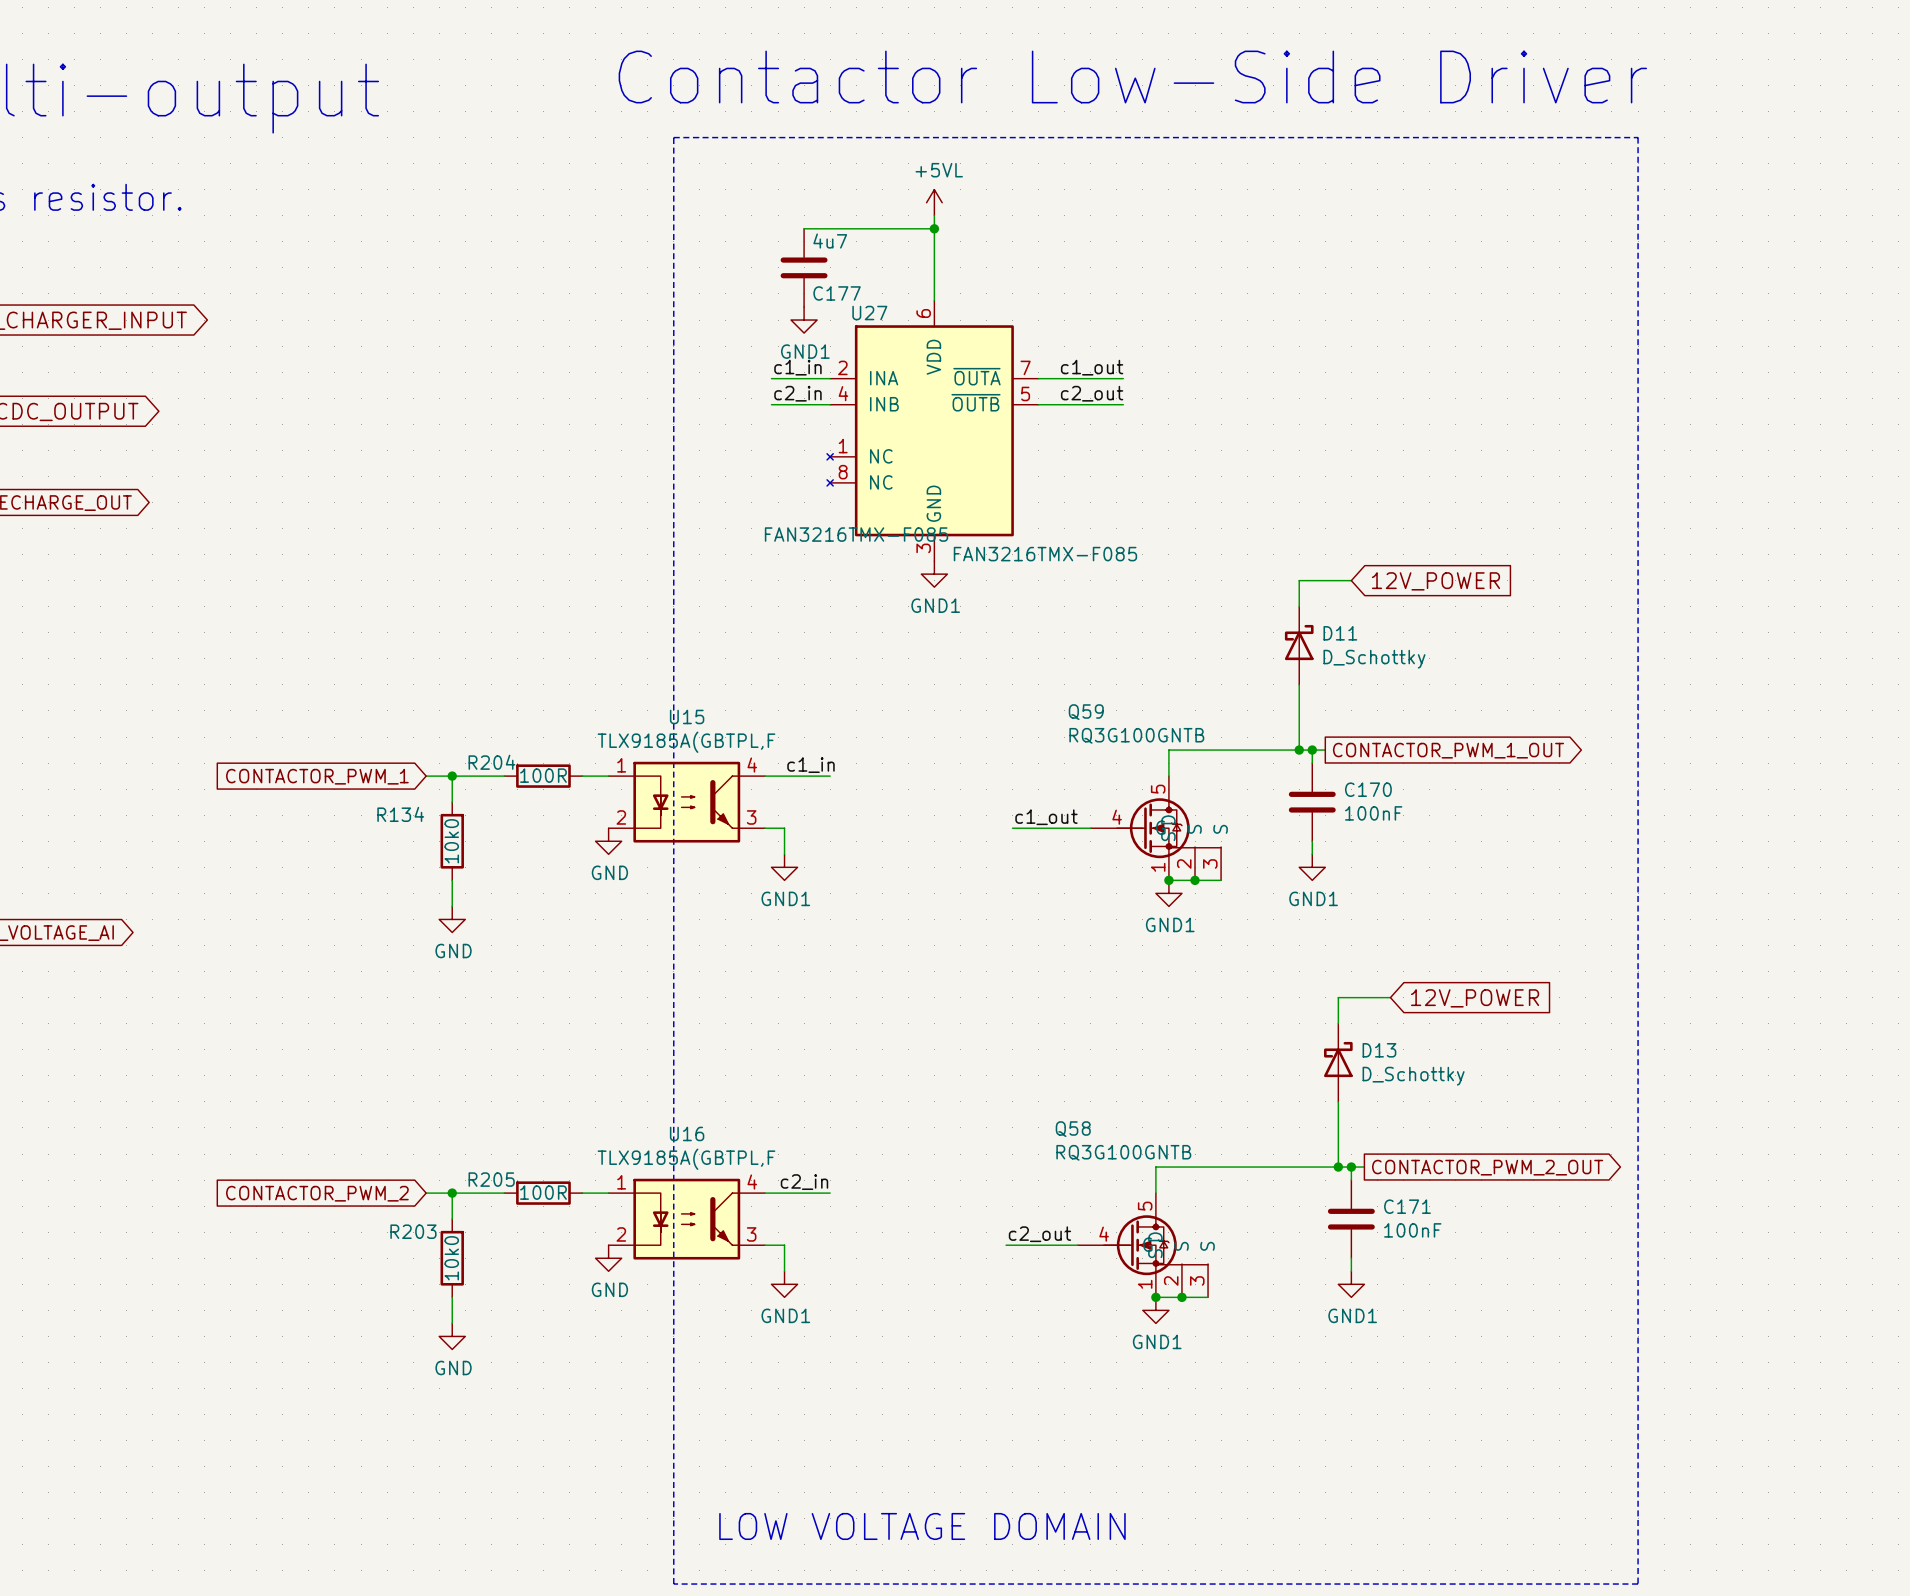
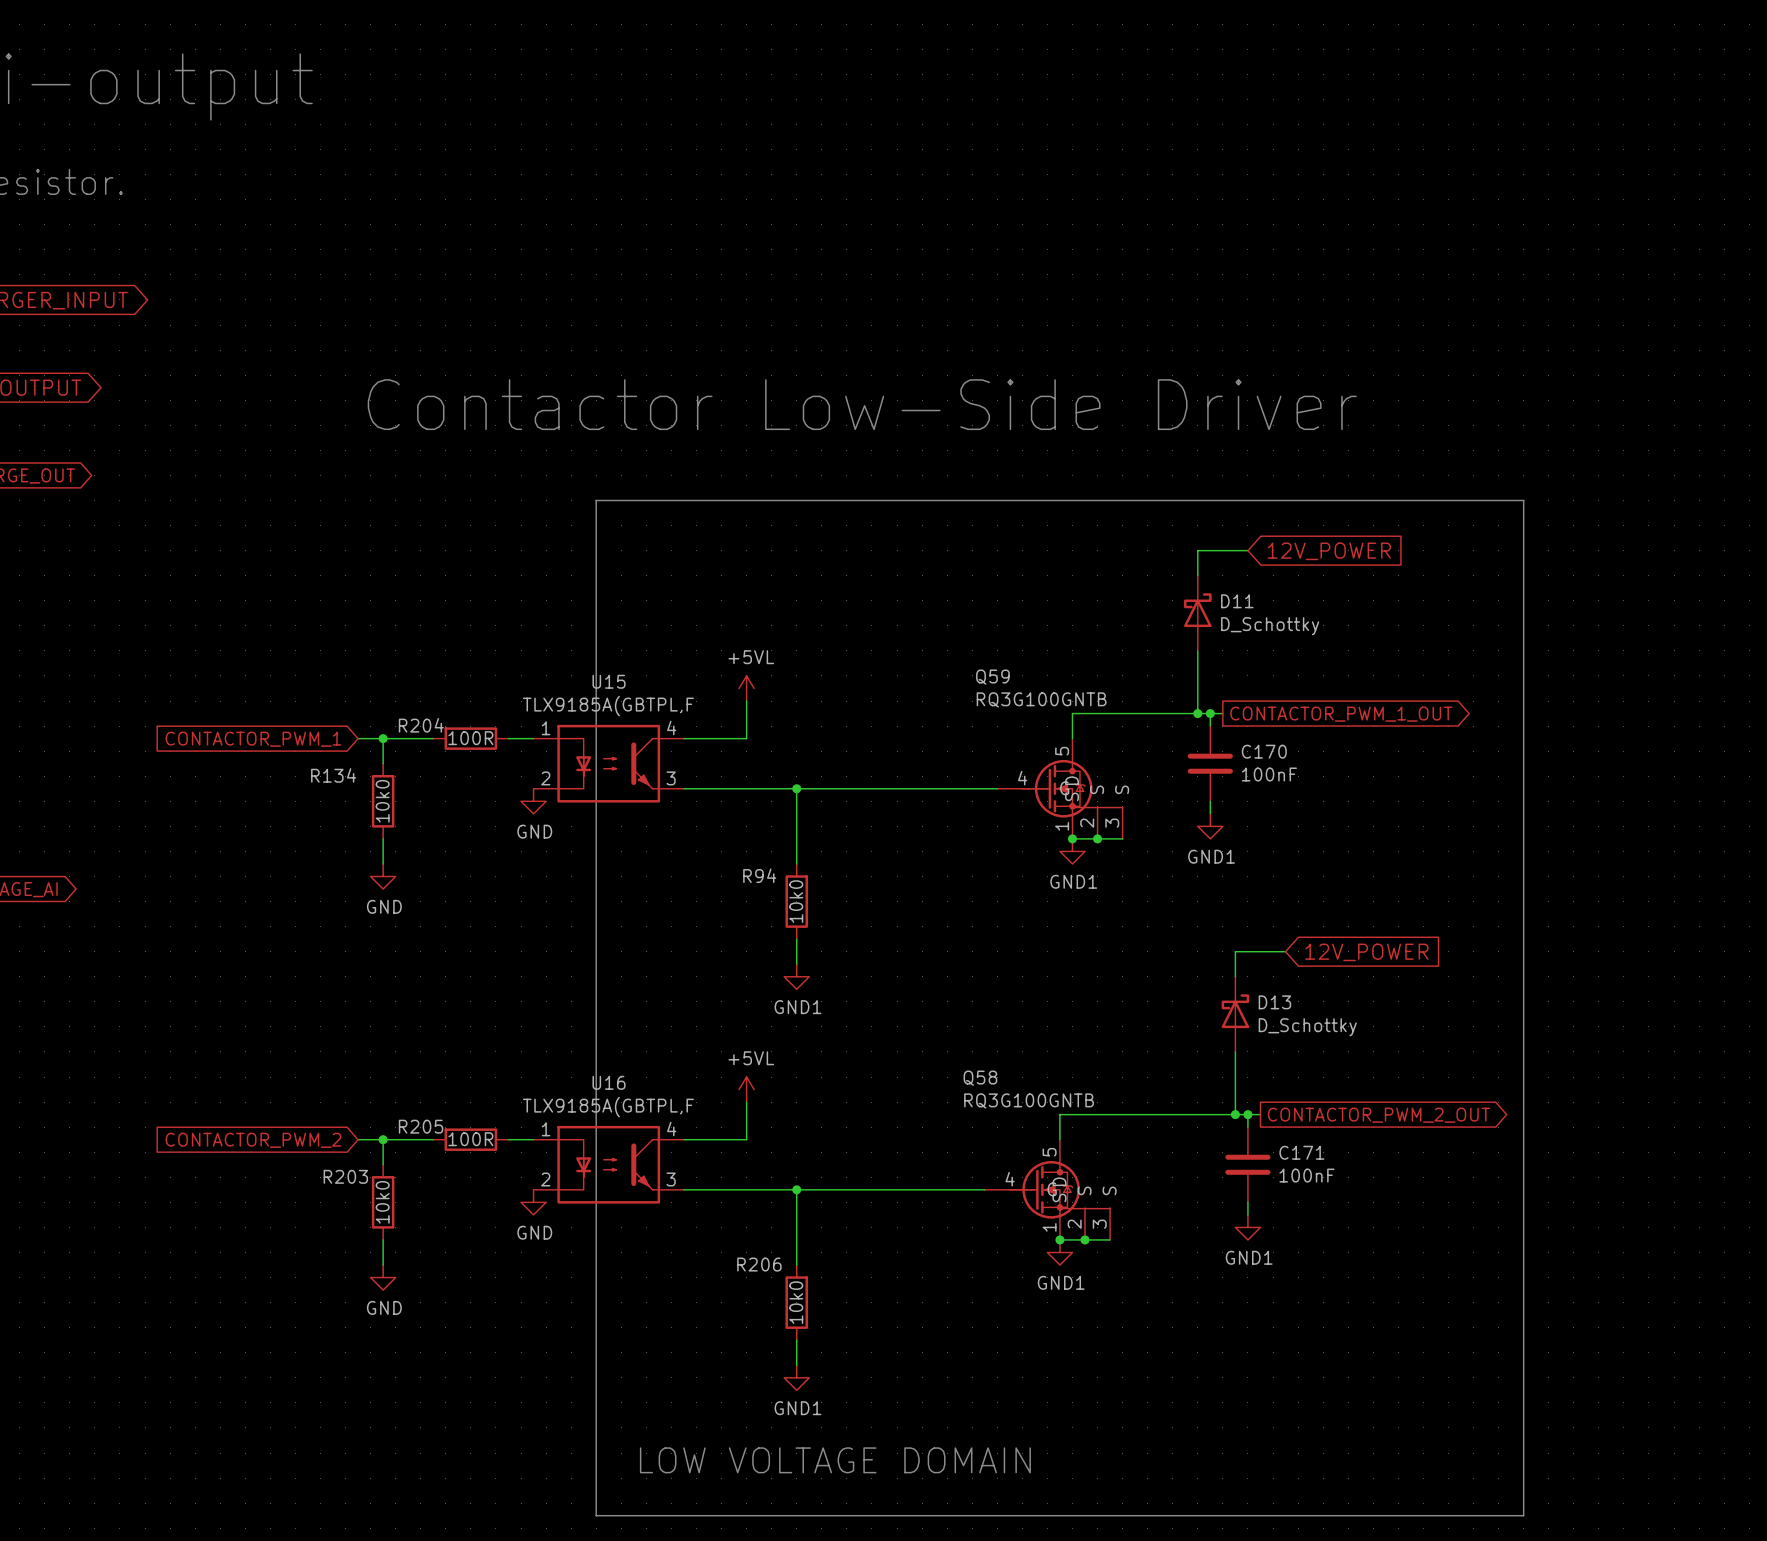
text: Contactor Low-Side Driver (1132, 77) -> none
line: (673, 137) (673, 1584) (1638, 1584) (1638, 137) (673, 137) -> (596, 500) (596, 1515) (1523, 1515) (1523, 500) (596, 500)
power symbol: +5VL (934, 202) -> none
wire: (934, 215) (934, 300) -> none
wire: (804, 228) (934, 228) -> none
junction: (934, 228) -> none
C177: 4u7 (804, 267) -> none
power symbol: GND1 (804, 320) -> none
label: c1_in (797, 367) -> none
label: c1_out (1092, 367) -> none
wire: (771, 378) (830, 378) -> none
wire: (1038, 378) (1123, 378) -> none
label: c2_in (797, 393) -> none
label: c2_out (1092, 393) -> none
wire: (771, 404) (830, 404) -> none
wire: (1038, 404) (1123, 404) -> none
text: none -> Contactor Low-Side Driver (862, 404)
U27: FAN3216TMX-F085 (932, 430) -> none
power symbol: GND1 (934, 574) -> none
power symbol: none -> +5VL (746, 688)
wire: none -> (746, 701) (746, 738)
label: c1_in (810, 765) -> none
label: c1_out (1046, 817) -> none
wire: (784, 828) (784, 854) -> (702, 788) (922, 788)
wire: none -> (796, 788) (796, 863)
junction: none -> (796, 788)
power symbol: GND1 (784, 867) -> none
R94: none -> 10k0 (796, 901)
wire: none -> (796, 939) (796, 964)
power symbol: none -> GND1 (796, 976)
power symbol: none -> +5VL (746, 1089)
wire: none -> (746, 1102) (746, 1139)
label: c2_in (804, 1182) -> none
label: c2_out (1039, 1234) -> none
wire: (784, 1245) (784, 1271) -> (702, 1189) (915, 1189)
wire: none -> (796, 1189) (796, 1265)
junction: none -> (796, 1189)
power symbol: GND1 (784, 1284) -> none
R206: none -> 10k0 (796, 1302)
wire: none -> (796, 1340) (796, 1365)
power symbol: none -> GND1 (796, 1377)

